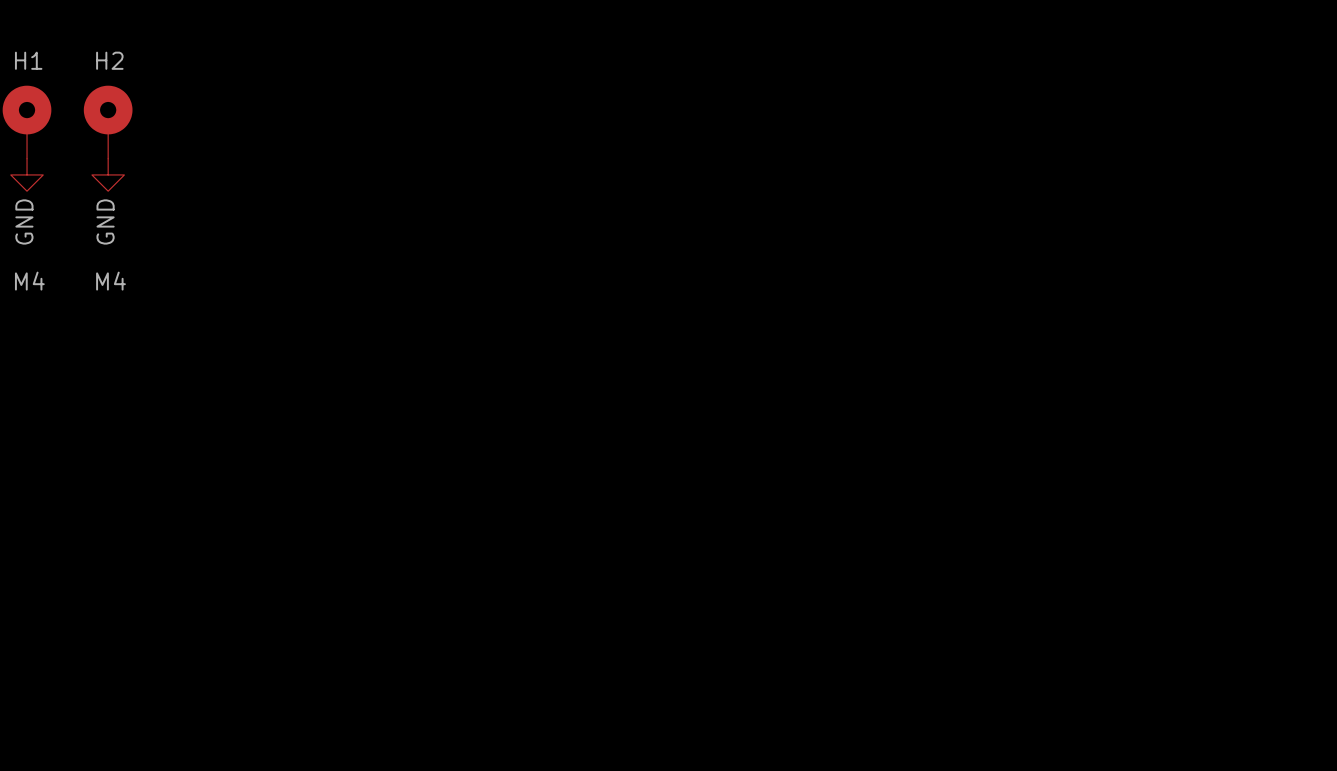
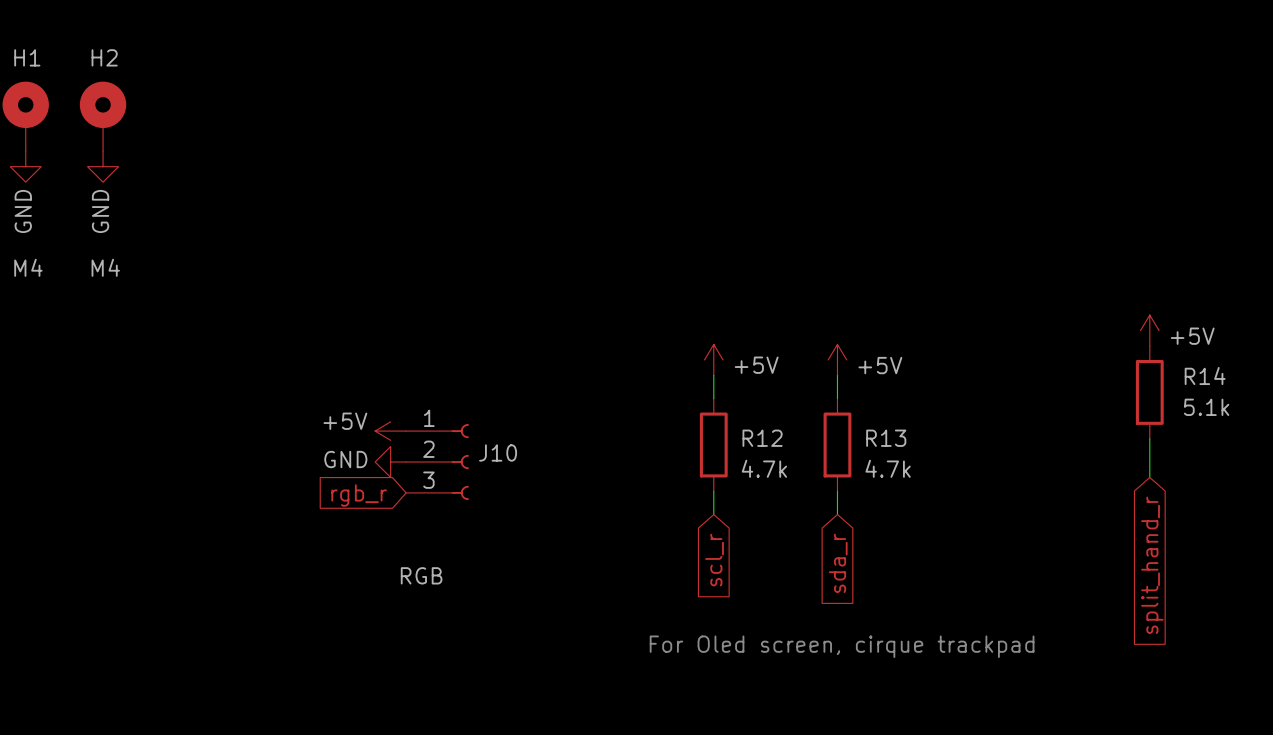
power symbol: none -> +5V (1149, 330)
power symbol: none -> +5V (713, 359)
power symbol: none -> +5V (837, 359)
wire: none -> (713, 375) (713, 398)
wire: none -> (837, 375) (837, 398)
R14: none -> 5.1k (1149, 392)
power symbol: none -> +5V (390, 431)
wire: none -> (1149, 438) (1149, 477)
R12: none -> 4.7k (713, 444)
R13: none -> 4.7k (837, 444)
power symbol: none -> GND (390, 462)
J10: none -> RGB (437, 462)
wire: none -> (713, 491) (713, 514)
wire: none -> (837, 491) (837, 514)
global label: none -> rgb_r (359, 495)
global label: none -> scl_r (714, 560)
global label: none -> sda_r (838, 563)
global label: none -> split_hand_r (1152, 565)
text: none -> For Oled screen, cirque trackpad (842, 646)

